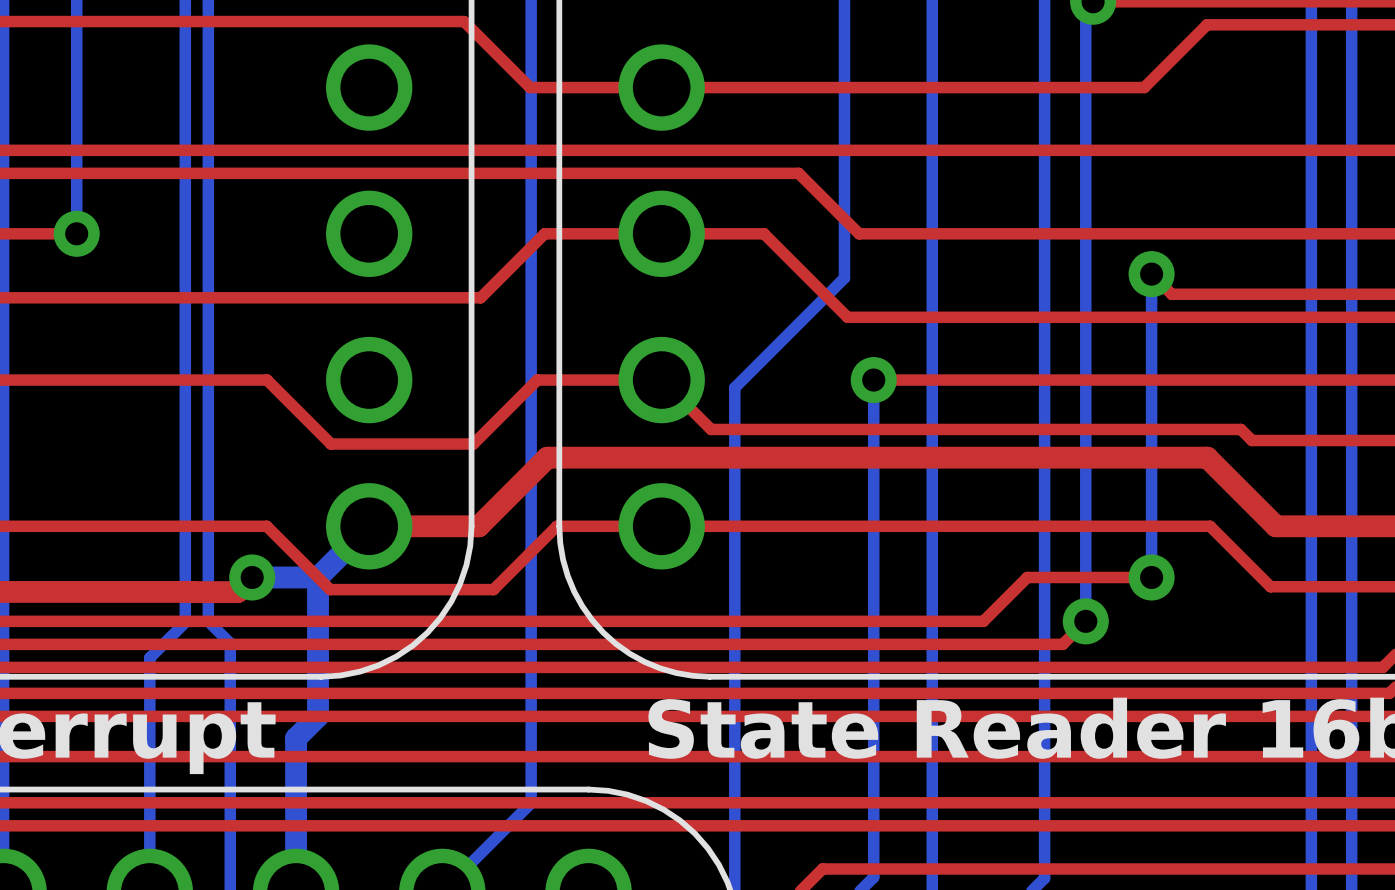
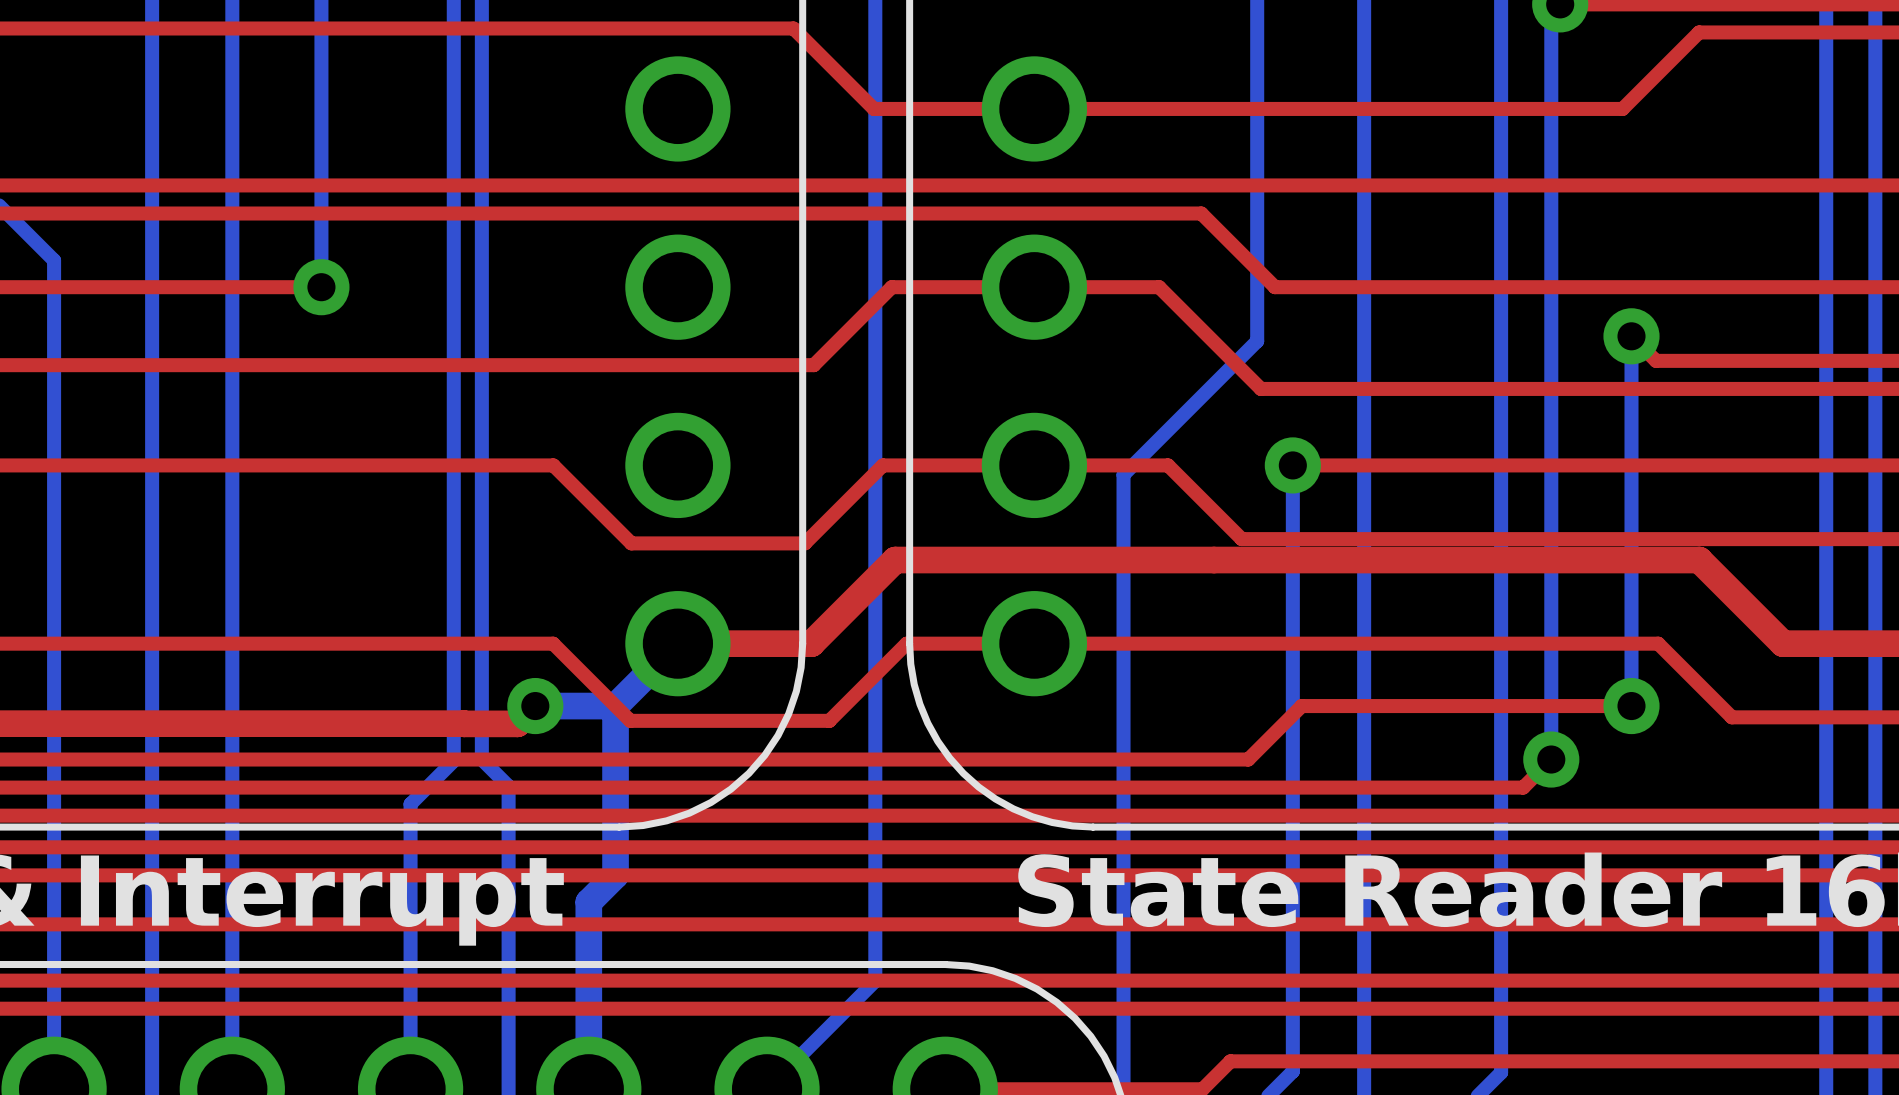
top track: (661, 380) (711, 429) (1240, 429) (1251, 440) -> (1034, 465) (1168, 465) (1241, 539) (1753, 539)
top track: (1173, 526) (1210, 526) (1270, 586) -> (1658, 643) (1731, 717) (1776, 717)
top track: (1027, 577) (983, 621) (837, 621) -> (1479, 706) (1301, 706) (1248, 759)

